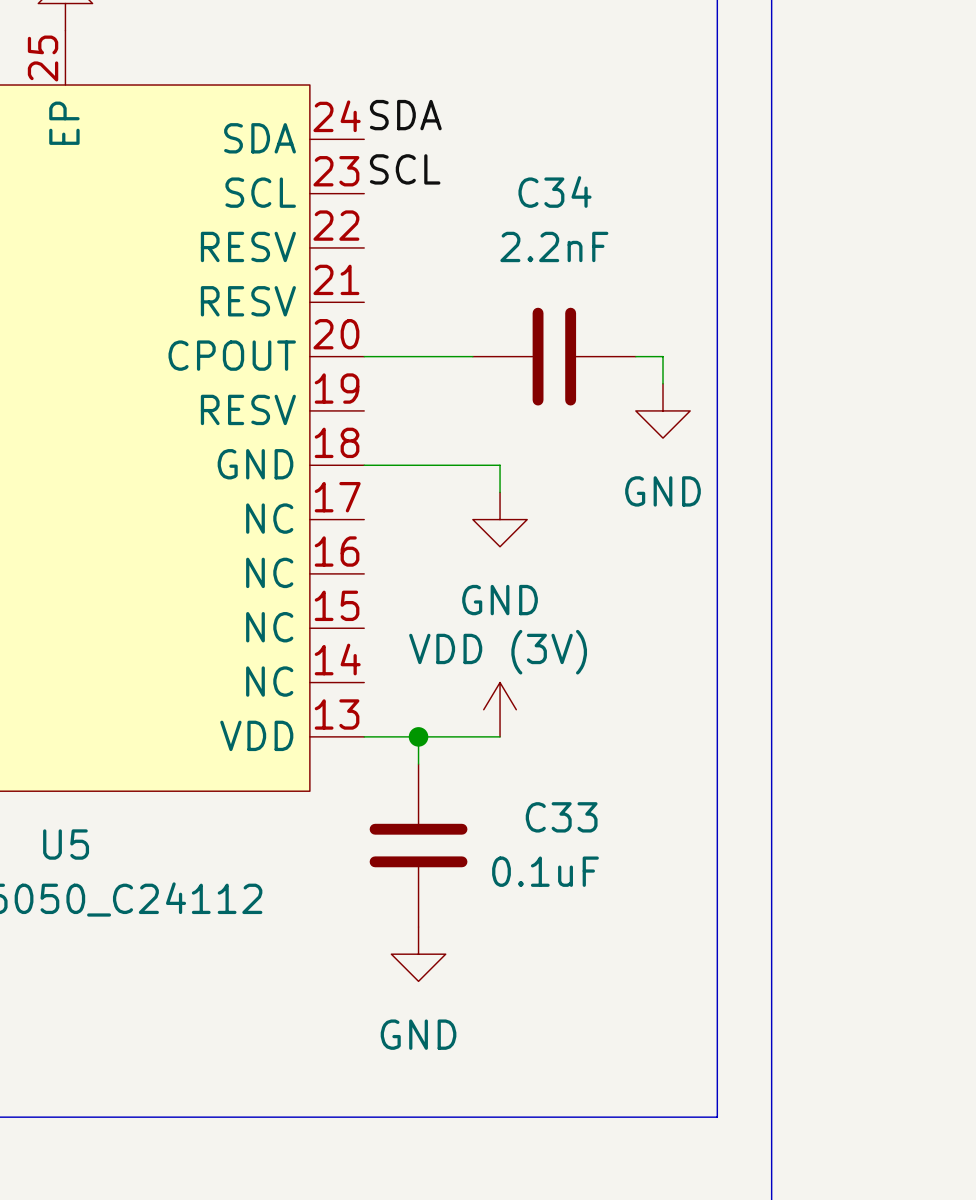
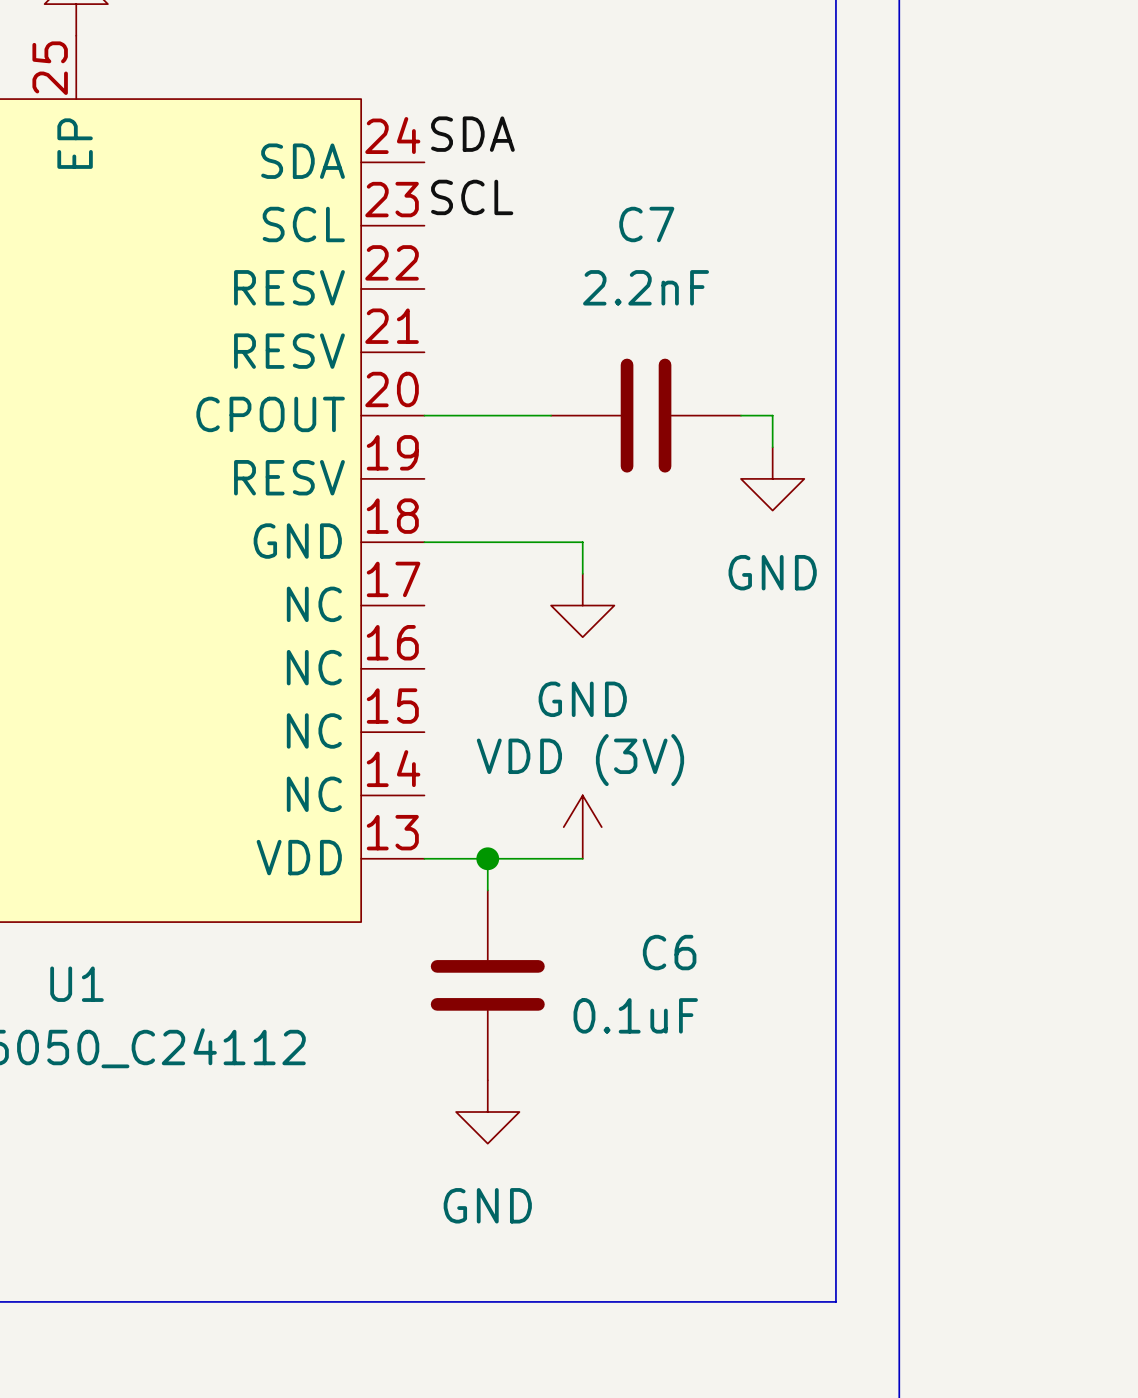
C34 name: C34 (554, 191) -> C7 (646, 224)
C33 name: C33 (561, 817) -> C6 (669, 952)
U5 name: U5 (66, 844) -> U1 (77, 984)

